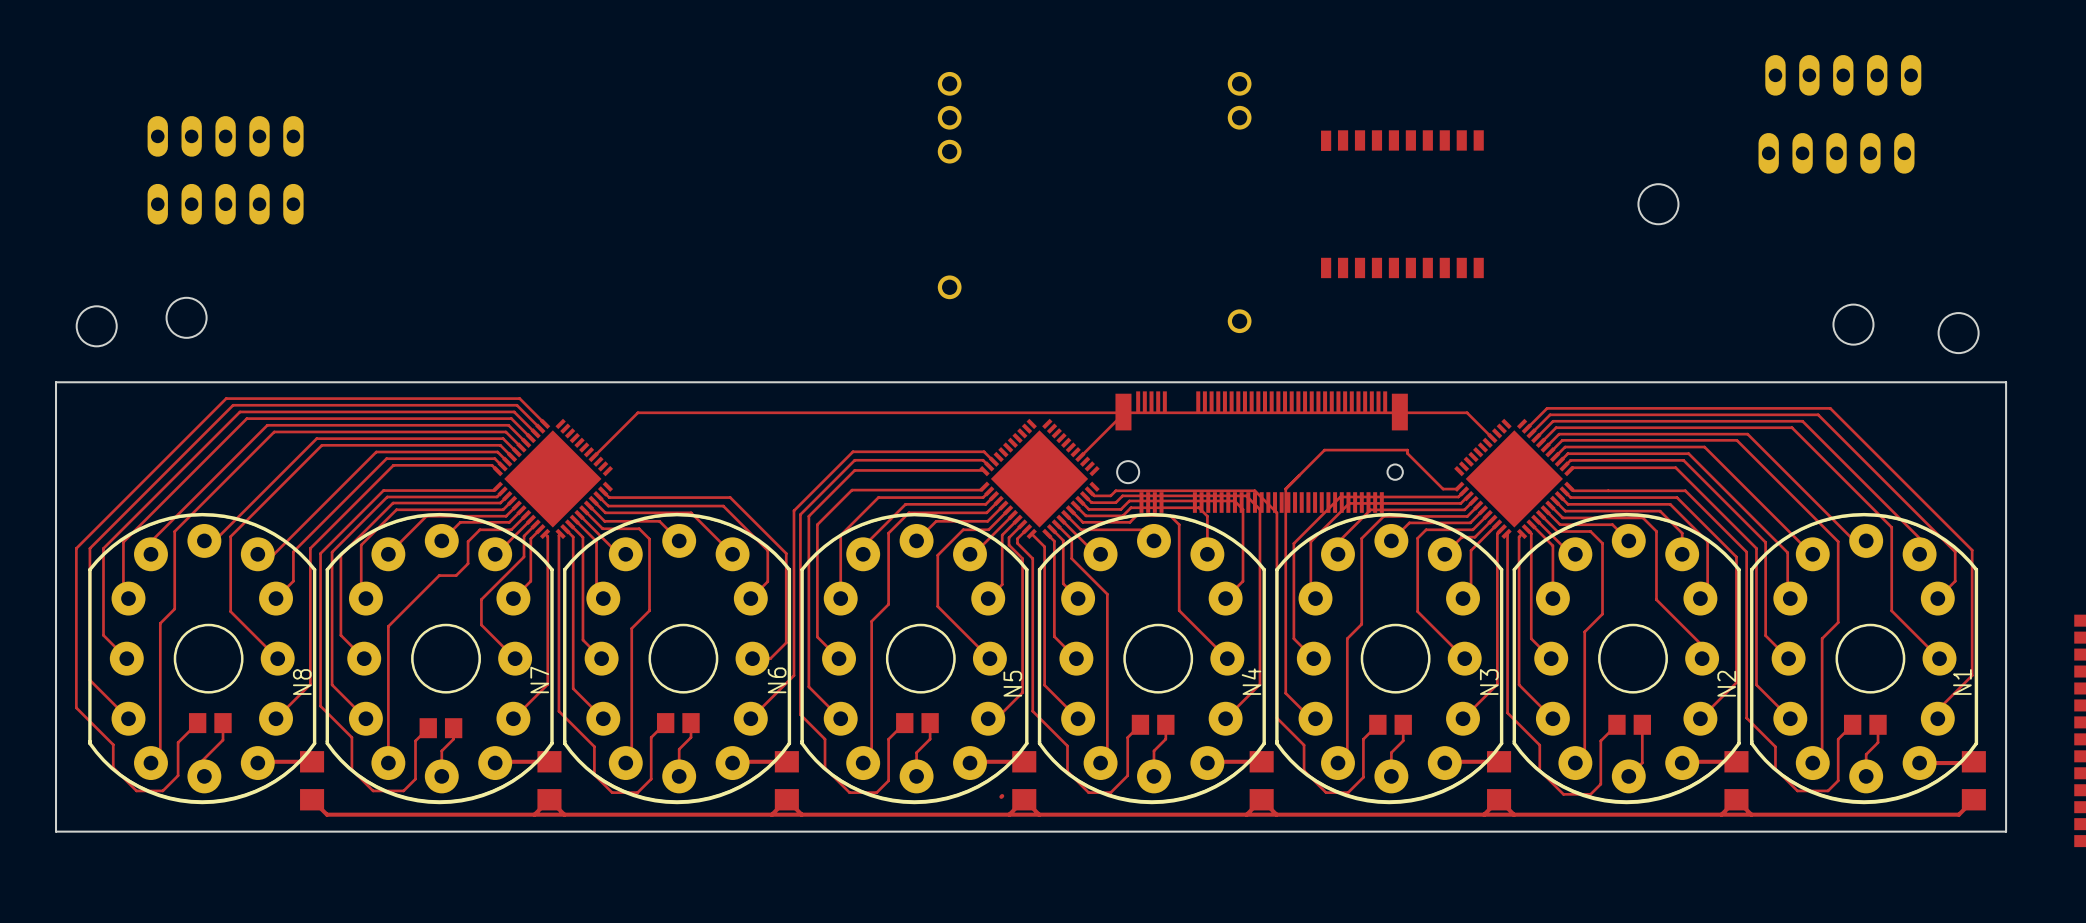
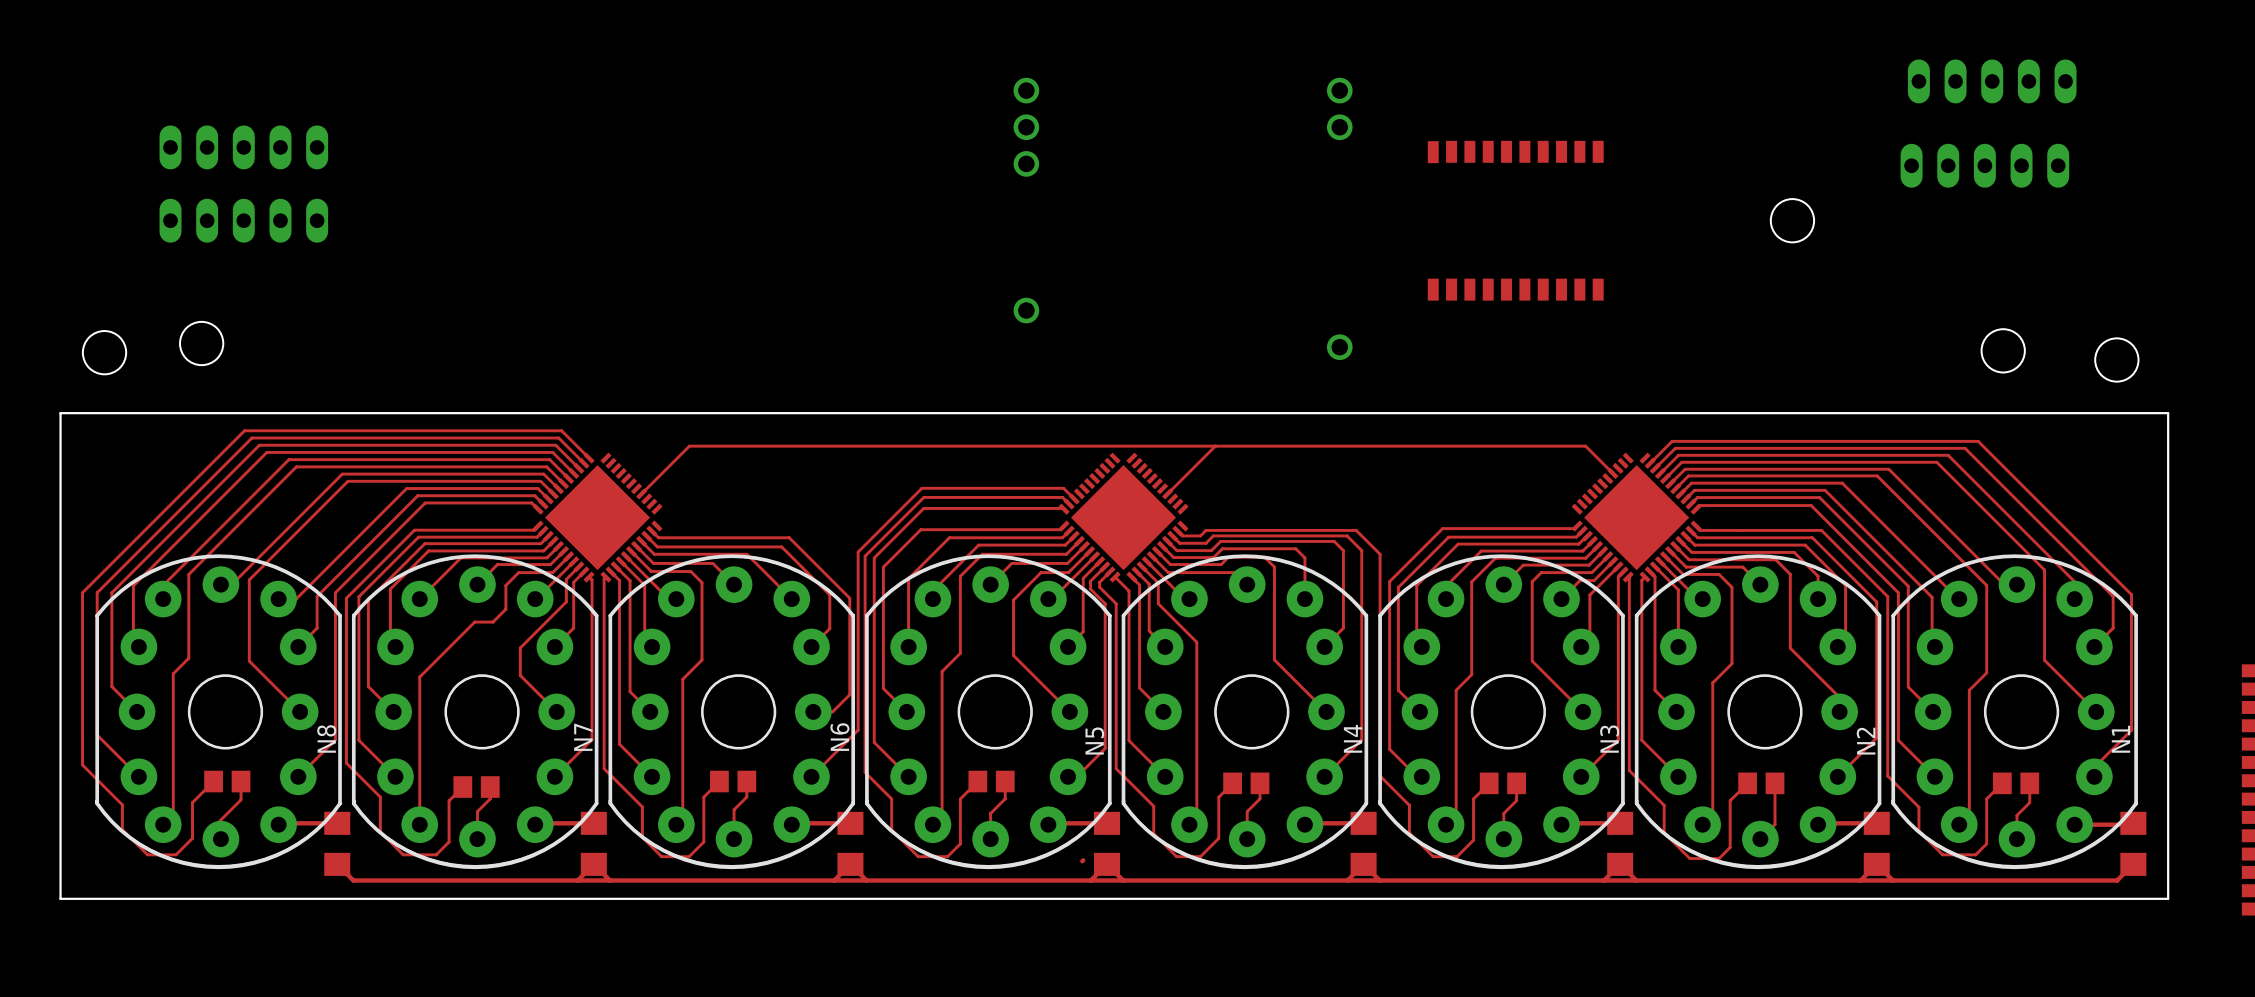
part: (1261, 452) -> none
top track: (1443, 489) (1407, 453) (1407, 450) (1324, 450) (1285, 488) (1285, 538) -> (1559, 528) (1442, 528) (1389, 581)

